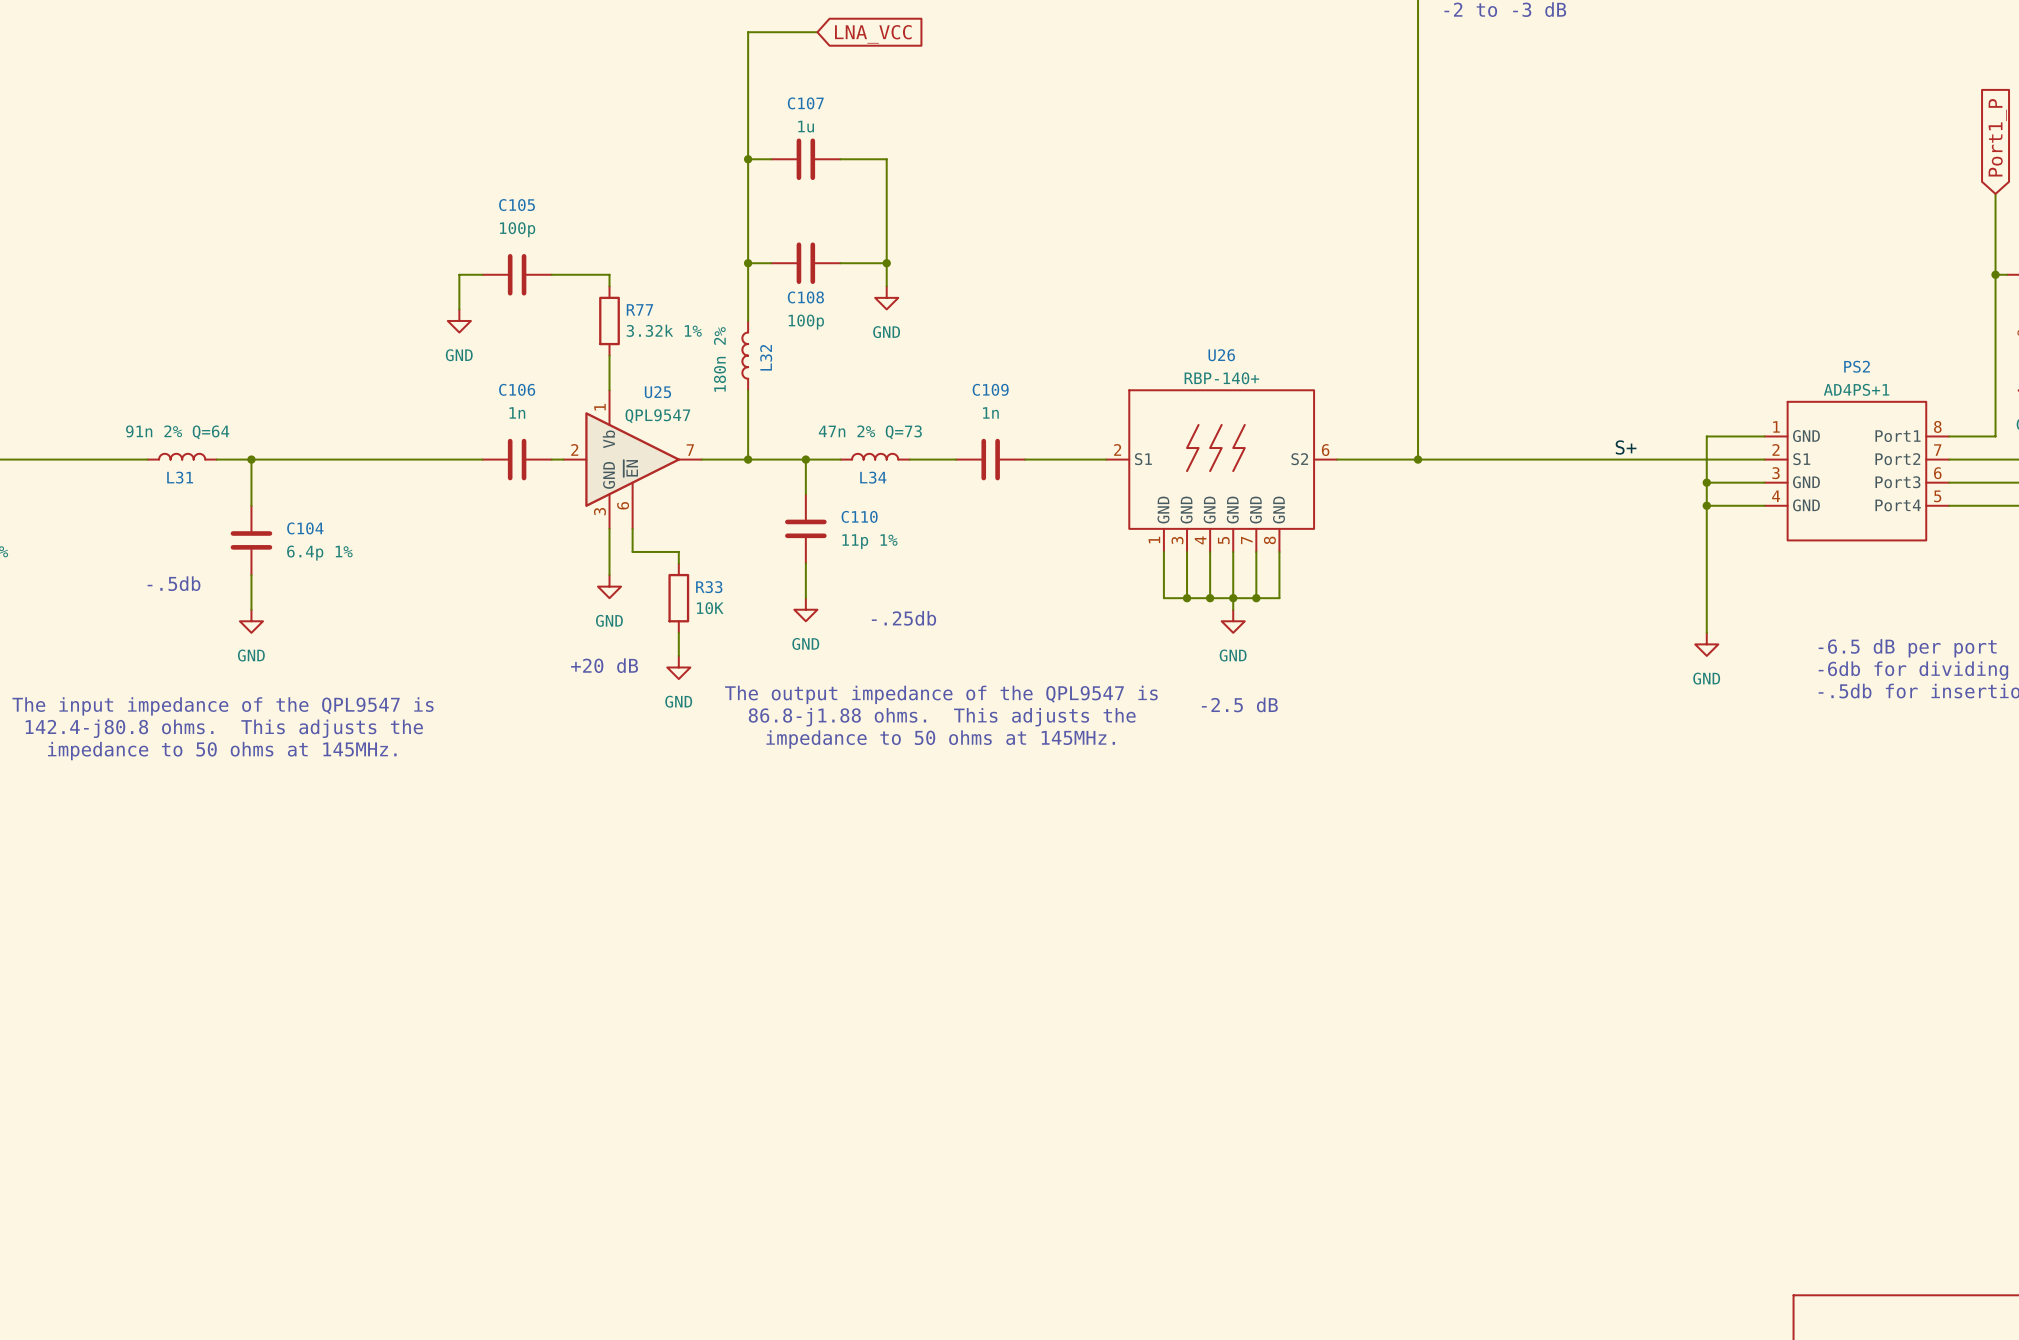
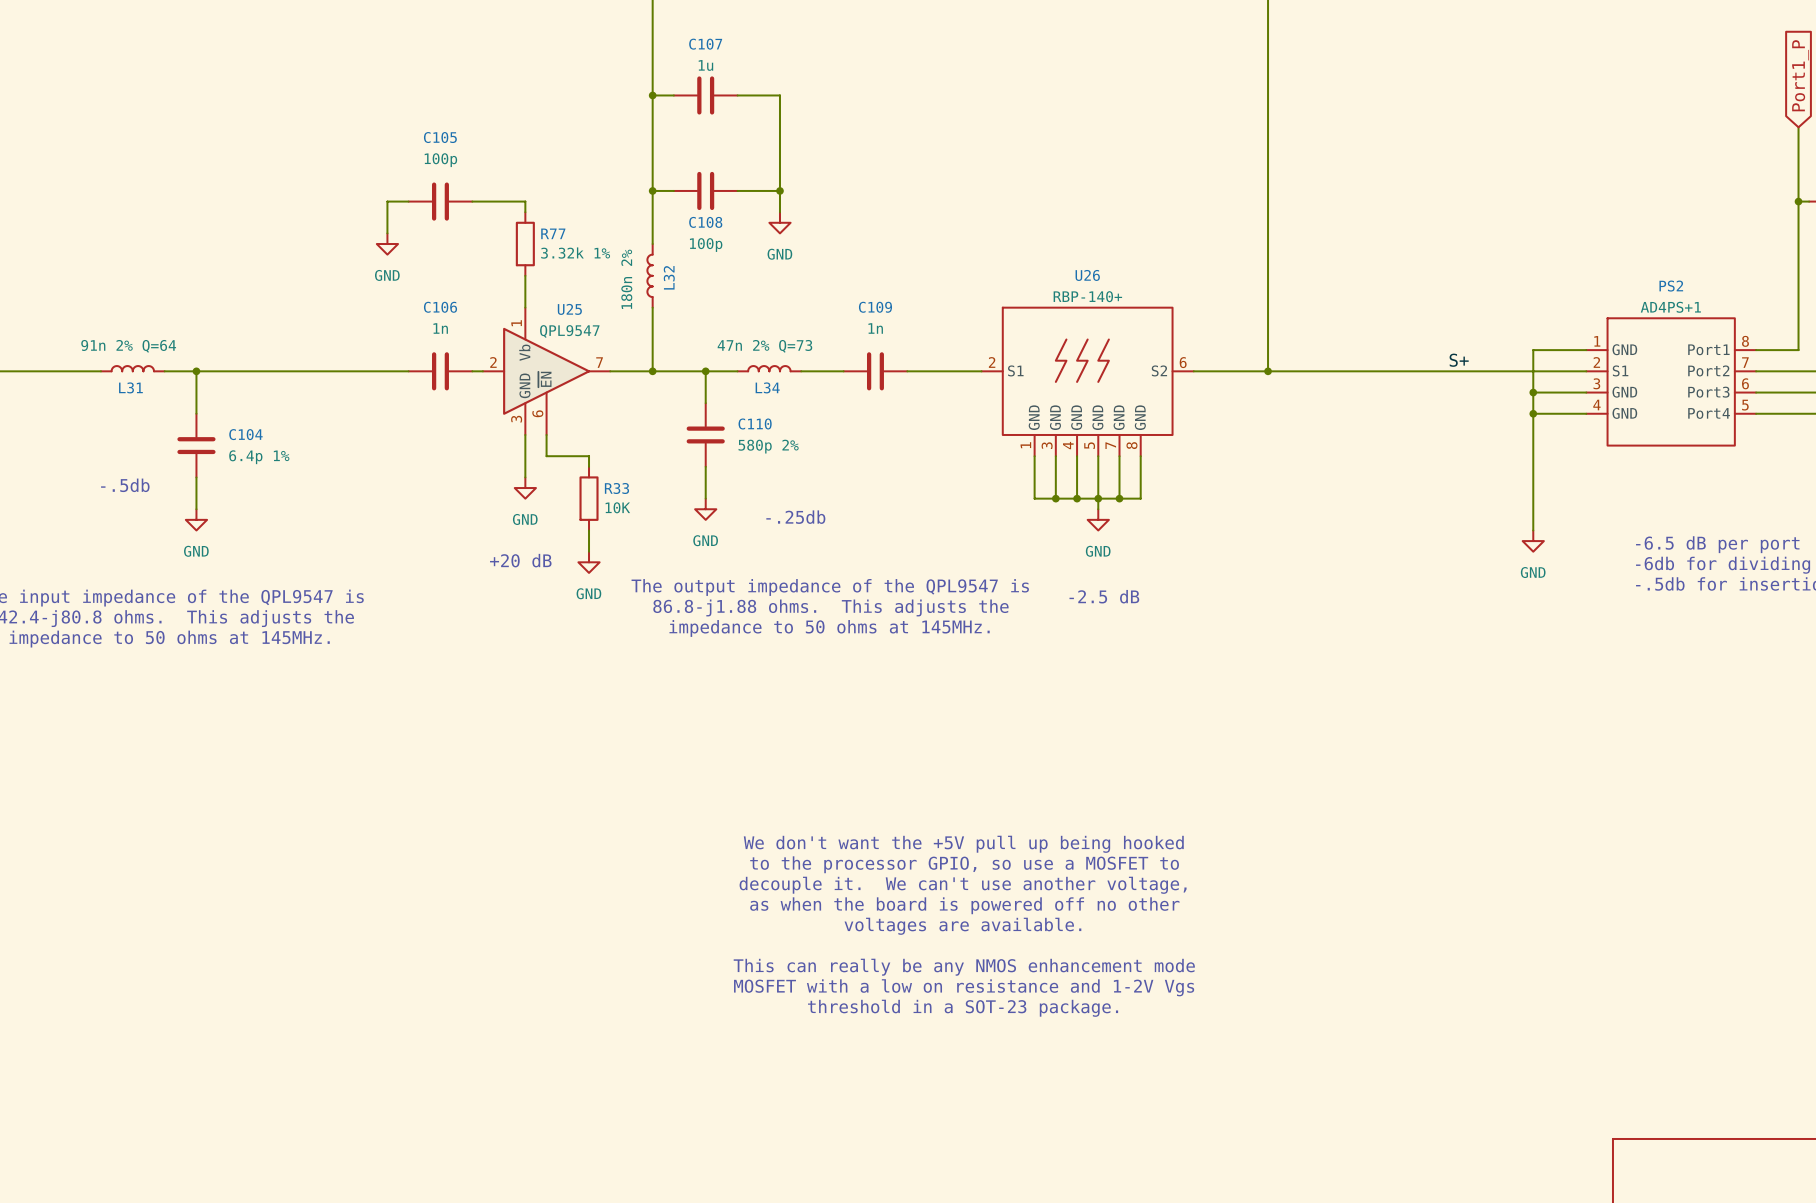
C110 value: 11p 1% (869, 541) -> 580p 2% (768, 446)
text: none -> We don't want the +5V pull up being hooked (963, 844)
text: none -> to the processor GPIO, so use a MOSFET to (964, 864)
text: none -> decouple it. We can't use another voltage, (963, 885)
text: none -> as when the board is powered off no other (964, 905)
text: none -> voltages are available. (962, 926)
text: none -> This can really be any NMOS enhancement mode (964, 967)
text: none -> MOSFET with a low on resistance and 1-2V Vgs (964, 987)
text: none -> threshold in a SOT-23 package. (963, 1008)

